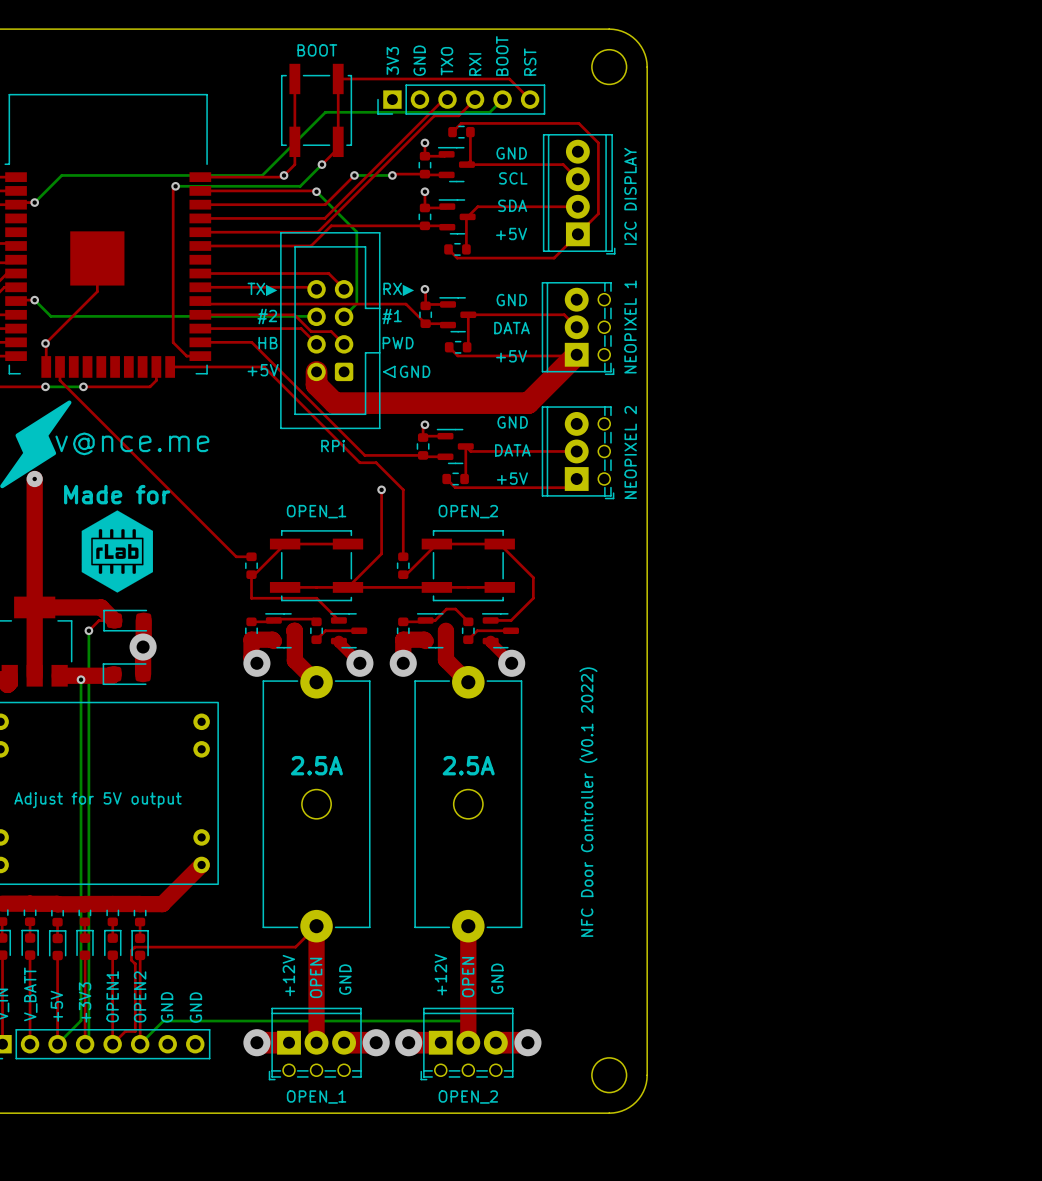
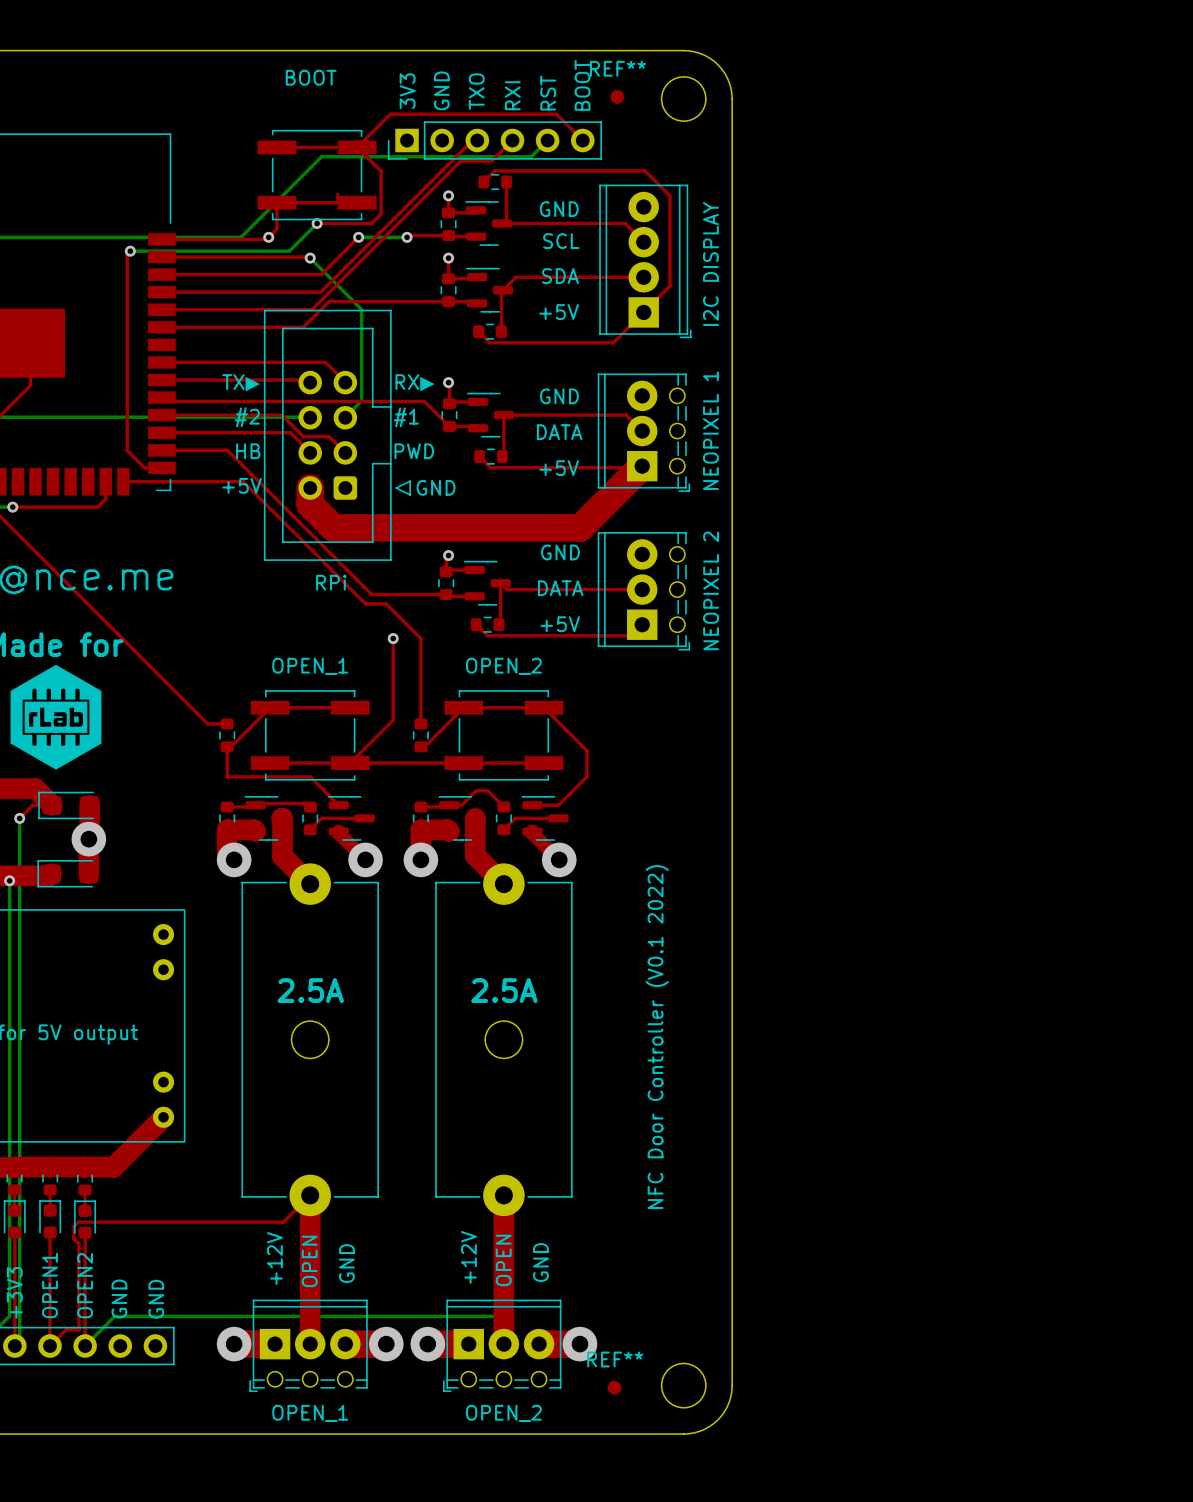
text: BOOT (502, 56) -> RST (548, 93)
text: RST (530, 62) -> BOOT (582, 85)
REF**: none -> (617, 96)
top track: (294, 78) (294, 164) (290, 168) -> (357, 202) (277, 202) (277, 229)
top track: (379, 78) (338, 78) (338, 141) -> (390, 114) (357, 147)
top track: none -> (277, 147) (357, 147)
part rotation: 0° (316, 110) -> 90° counterclockwise (317, 175)
top track: (338, 148) (321, 164) -> (357, 147) (381, 171) (381, 214) (371, 223) (317, 223)
REF**: none -> (614, 1387)

